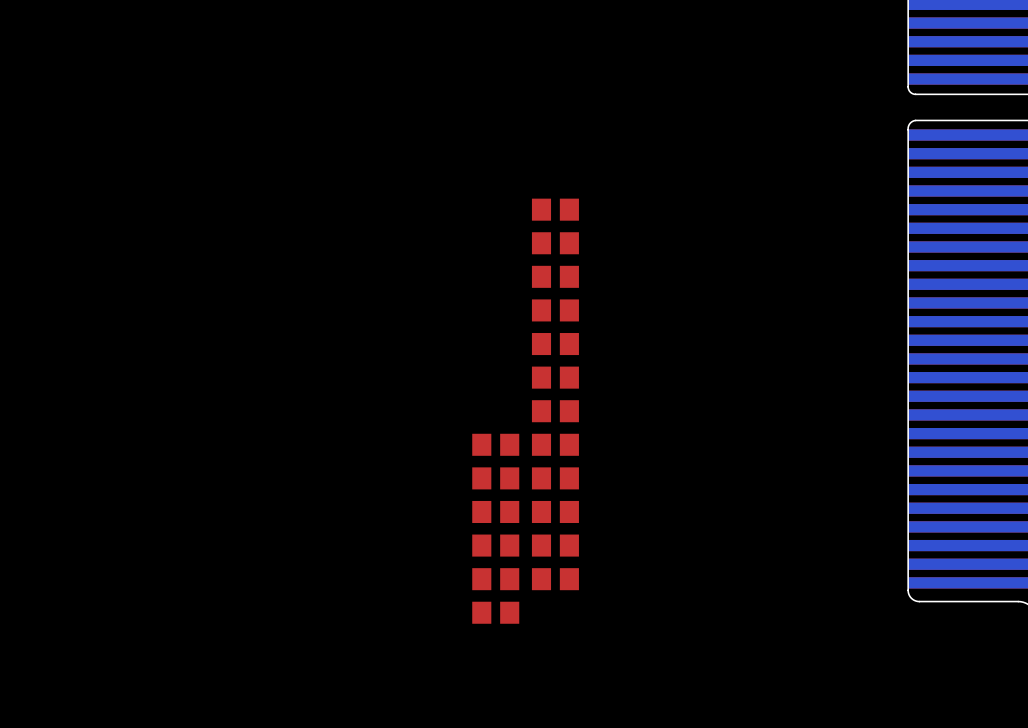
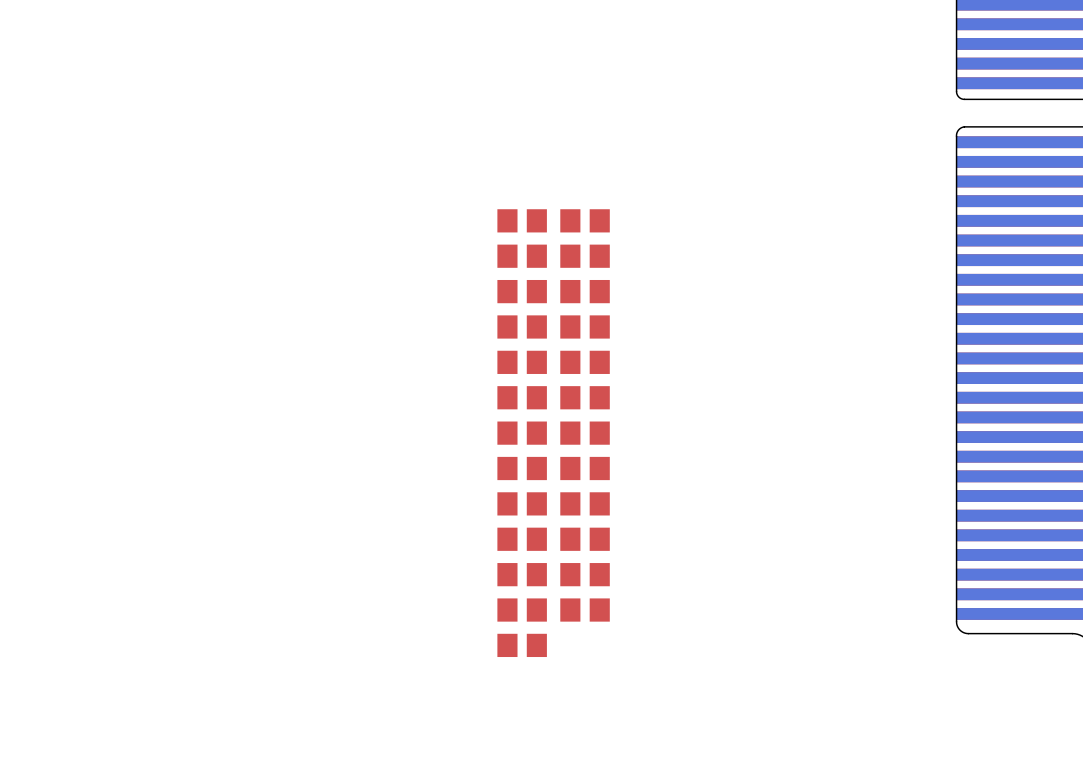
part: none -> (522, 220)
part: none -> (522, 256)
part: none -> (522, 291)
part: none -> (522, 326)
part: none -> (522, 362)
part: none -> (522, 397)
part: none -> (522, 433)

